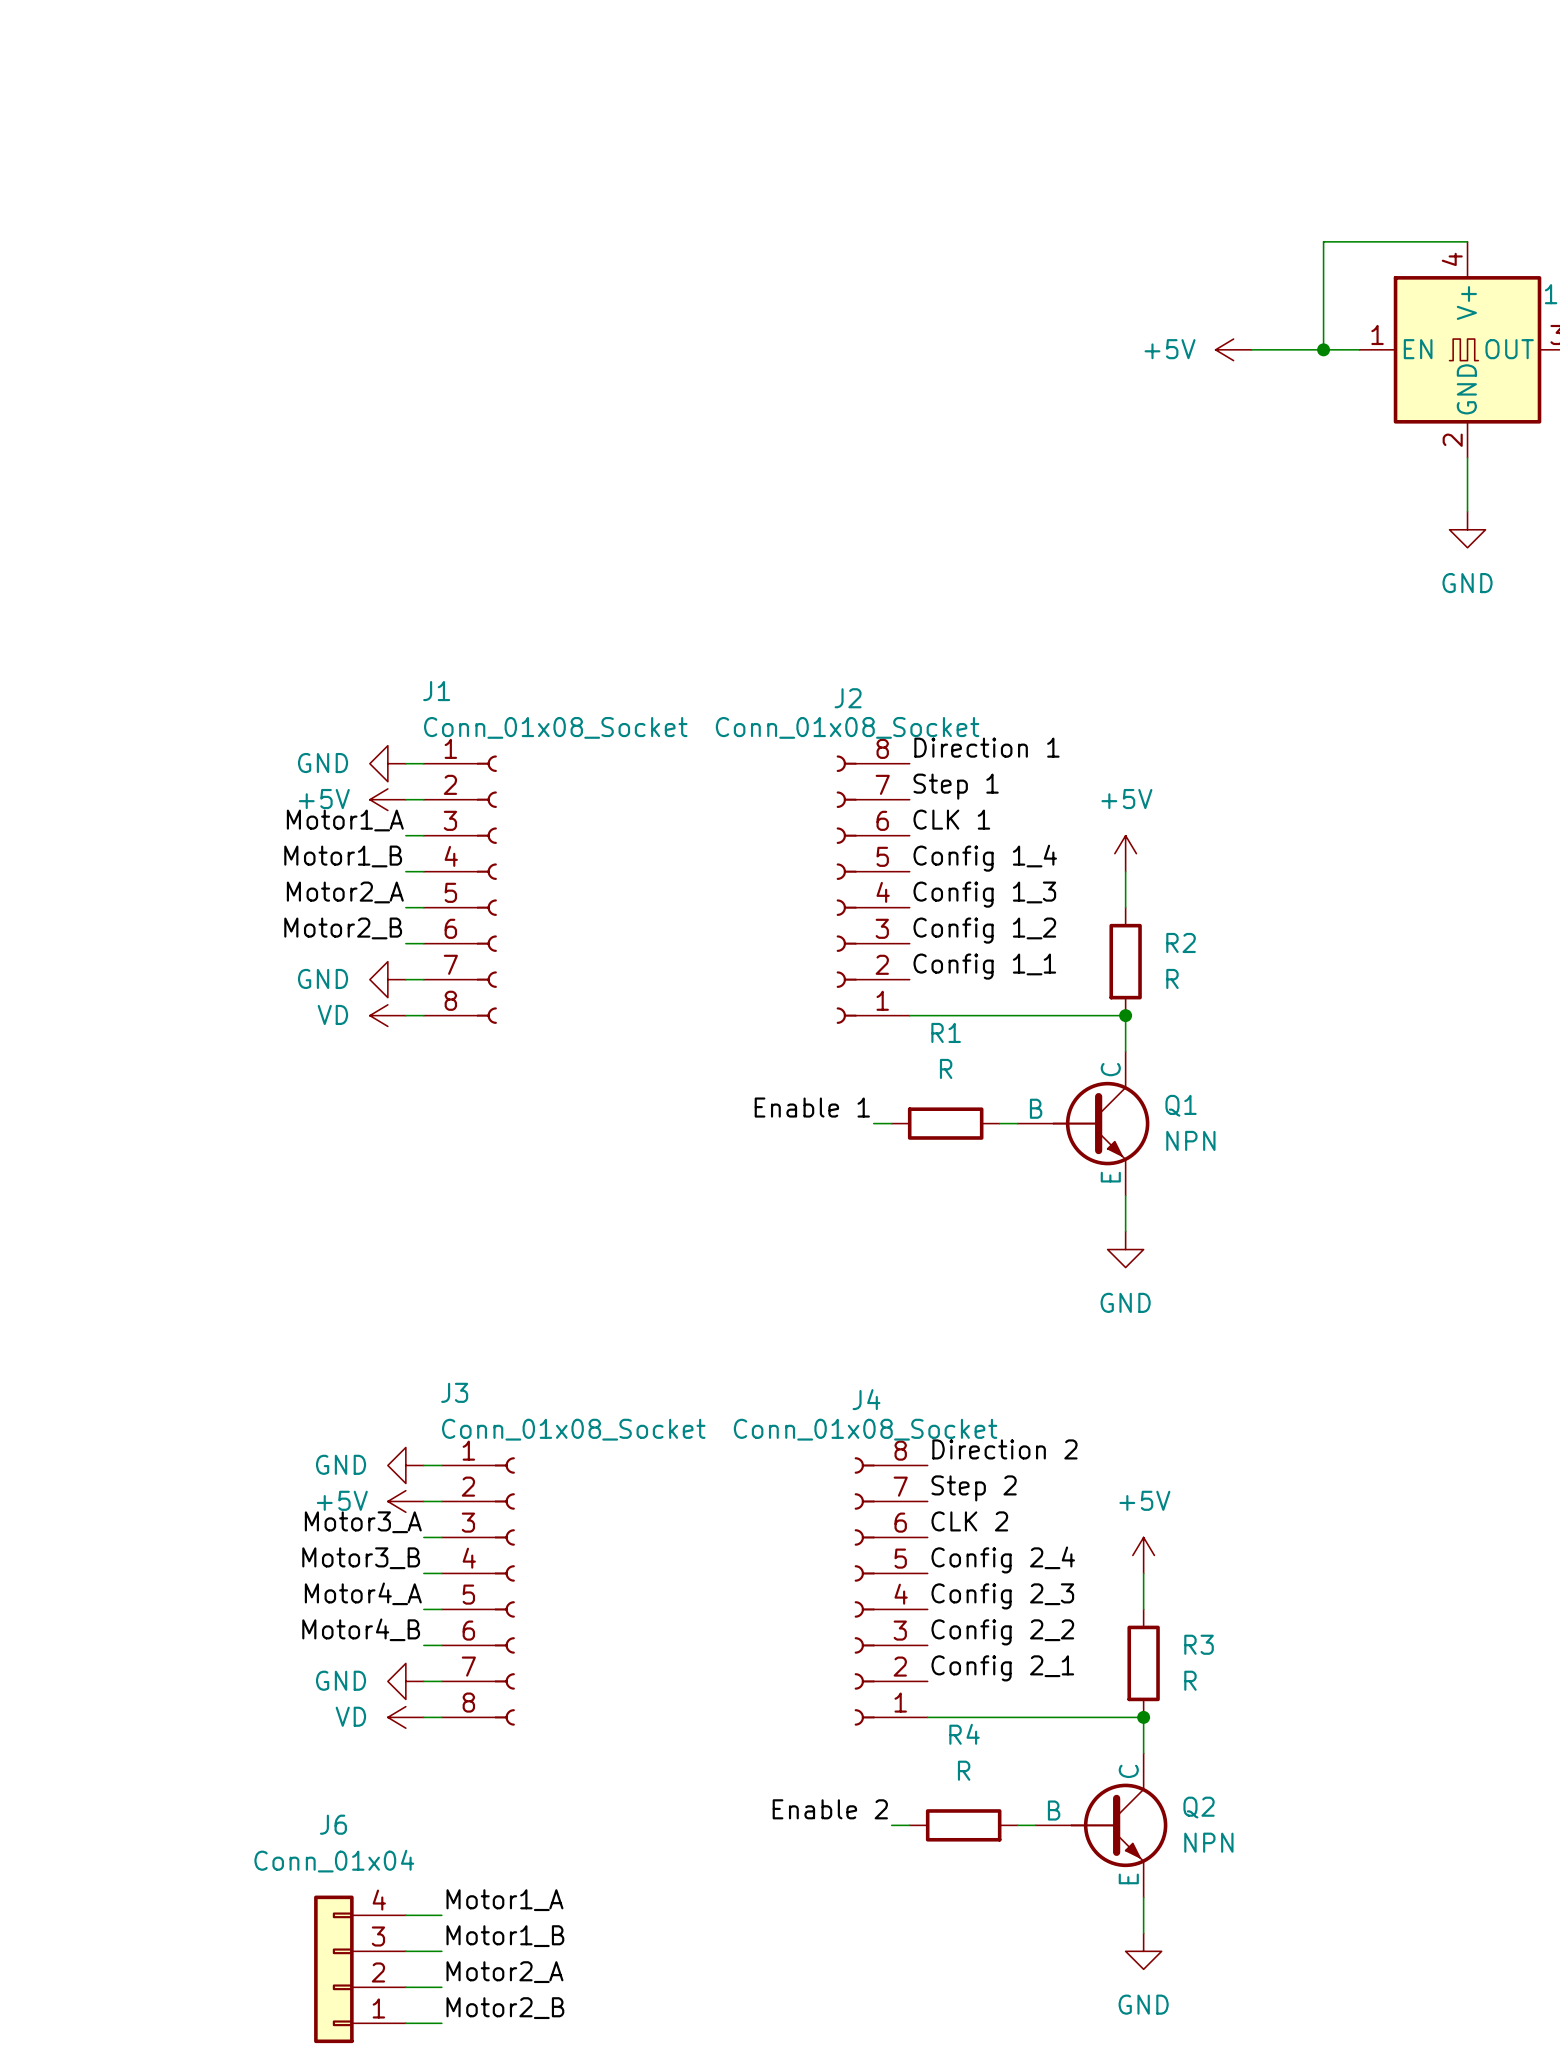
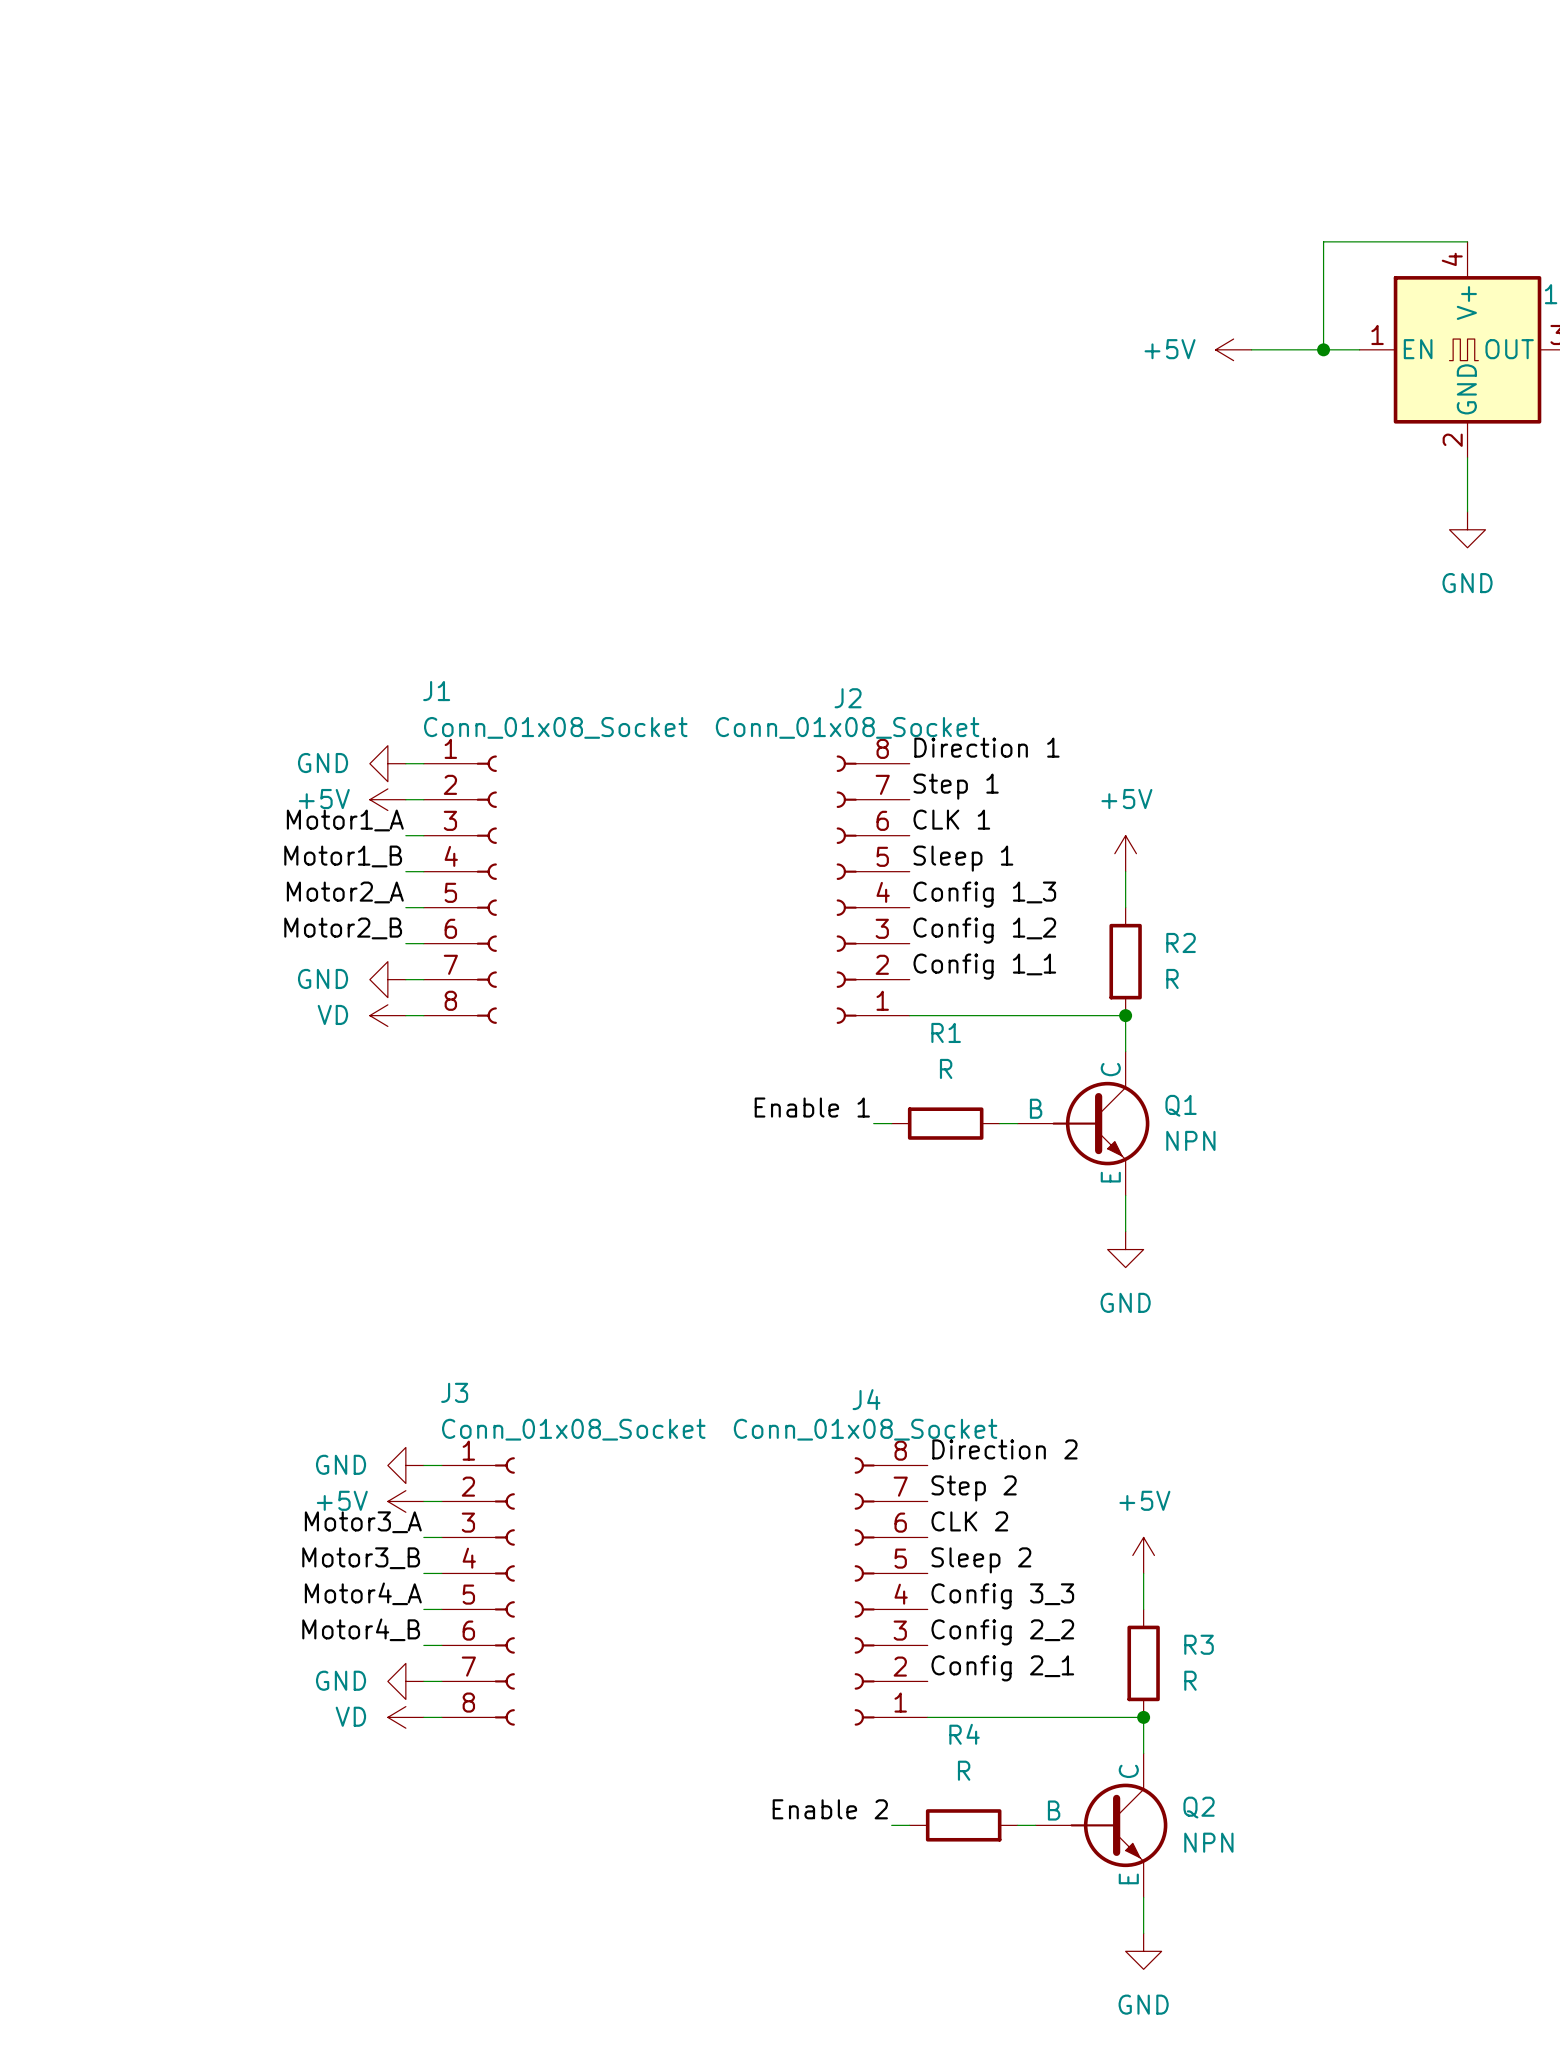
label: Config 1_4 (985, 858) -> Sleep 1 (963, 858)
label: Config 2_4 (1003, 1559) -> Sleep 2 (981, 1560)
label: Config 2_3 (1002, 1596) -> Config 3_3 (1002, 1596)
label: Motor1_A (504, 1900) -> none
wire: (405, 1915) (441, 1915) -> none
label: Motor1_B (505, 1936) -> none
wire: (405, 1951) (441, 1951) -> none
J6: Conn_01x04 (359, 1969) -> none
label: Motor2_A (504, 1972) -> none
wire: (405, 1987) (441, 1987) -> none
label: Motor2_B (505, 2008) -> none
wire: (405, 2023) (441, 2023) -> none

